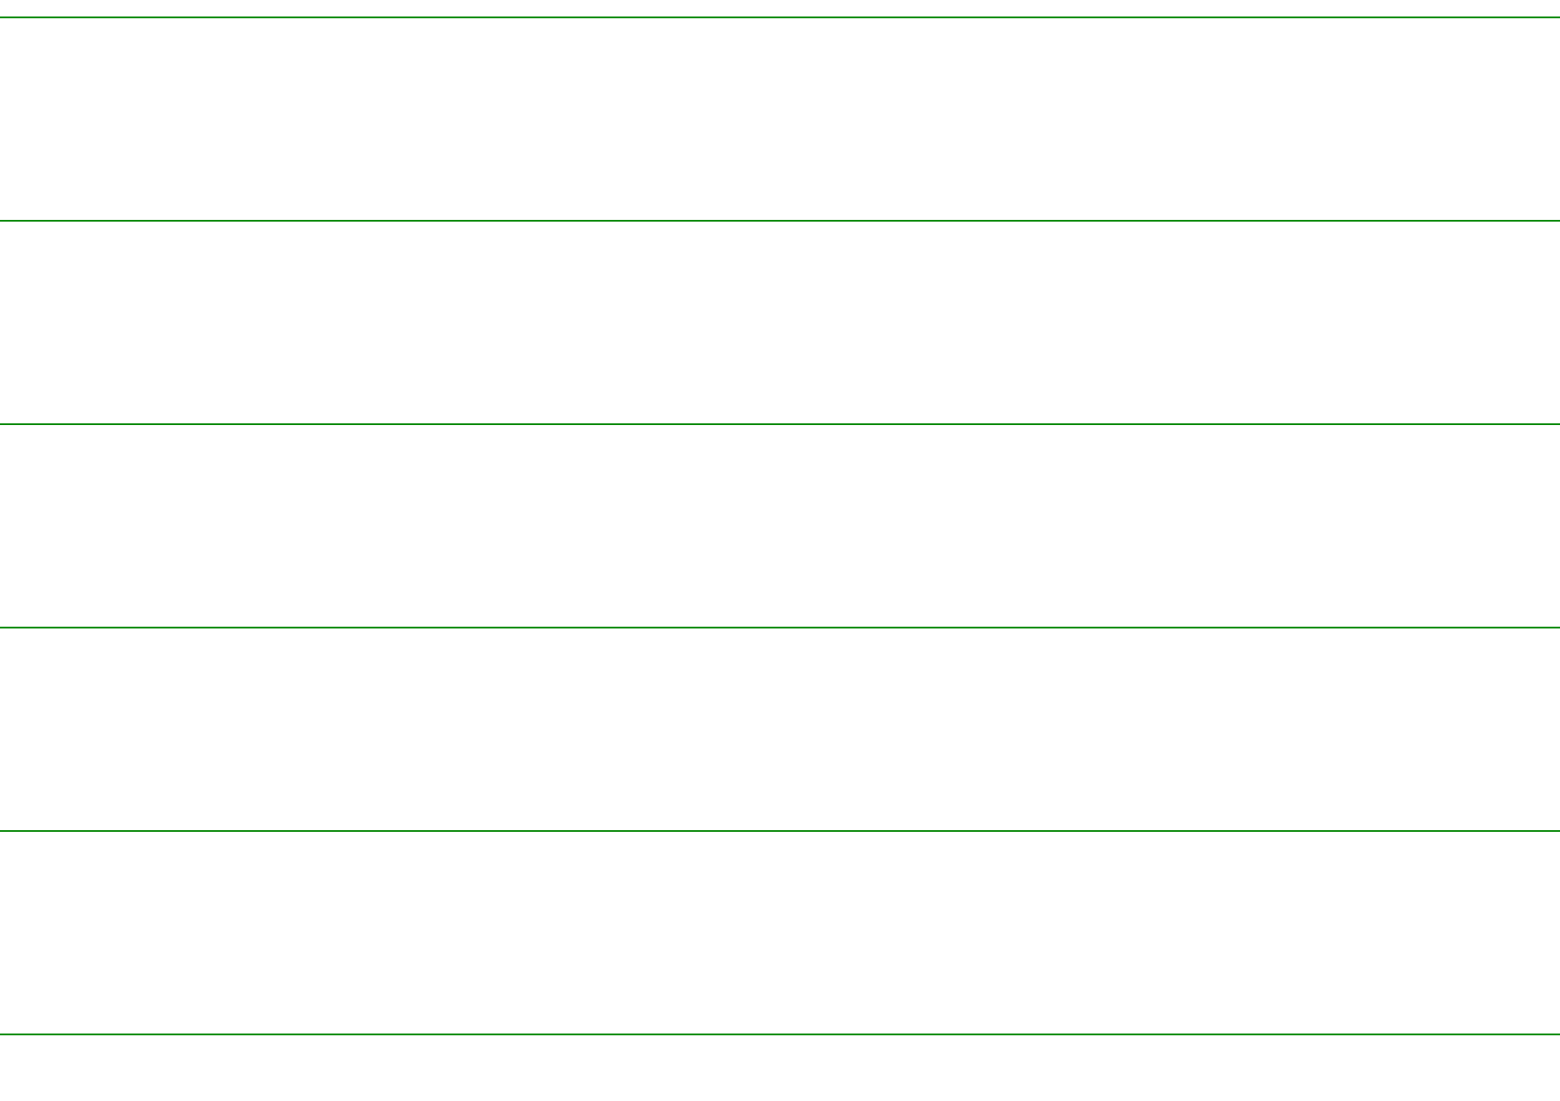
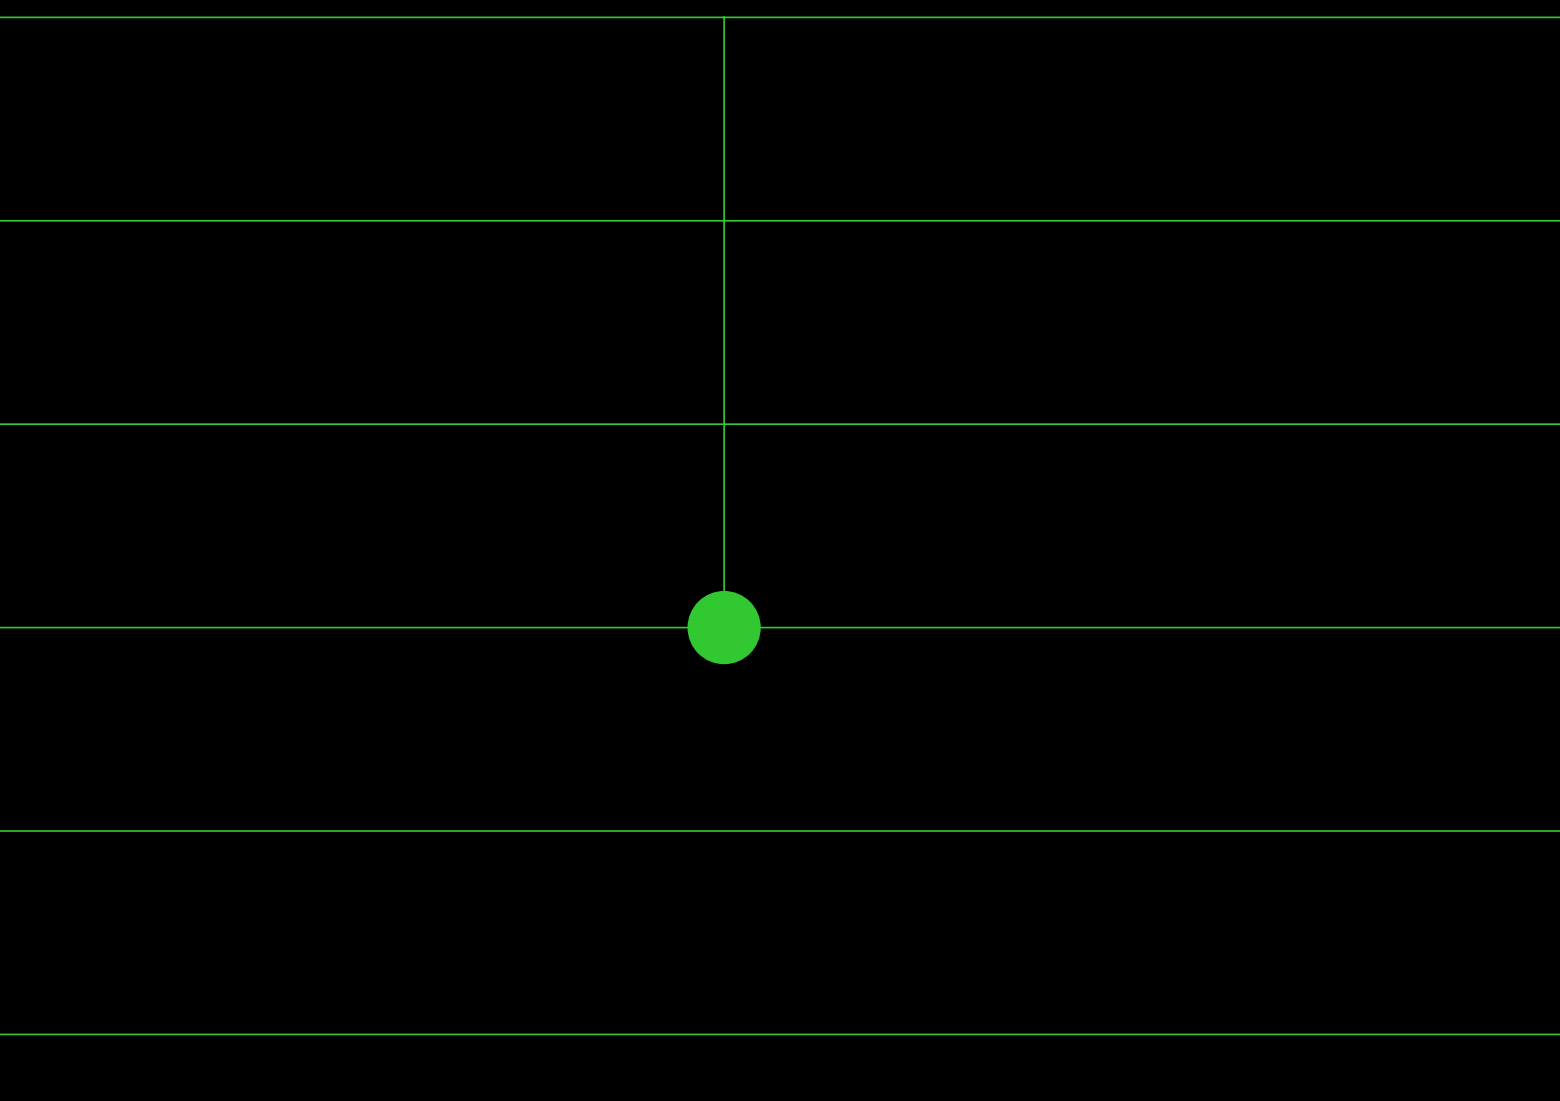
wire: none -> (724, 17) (724, 627)
junction: none -> (724, 627)

